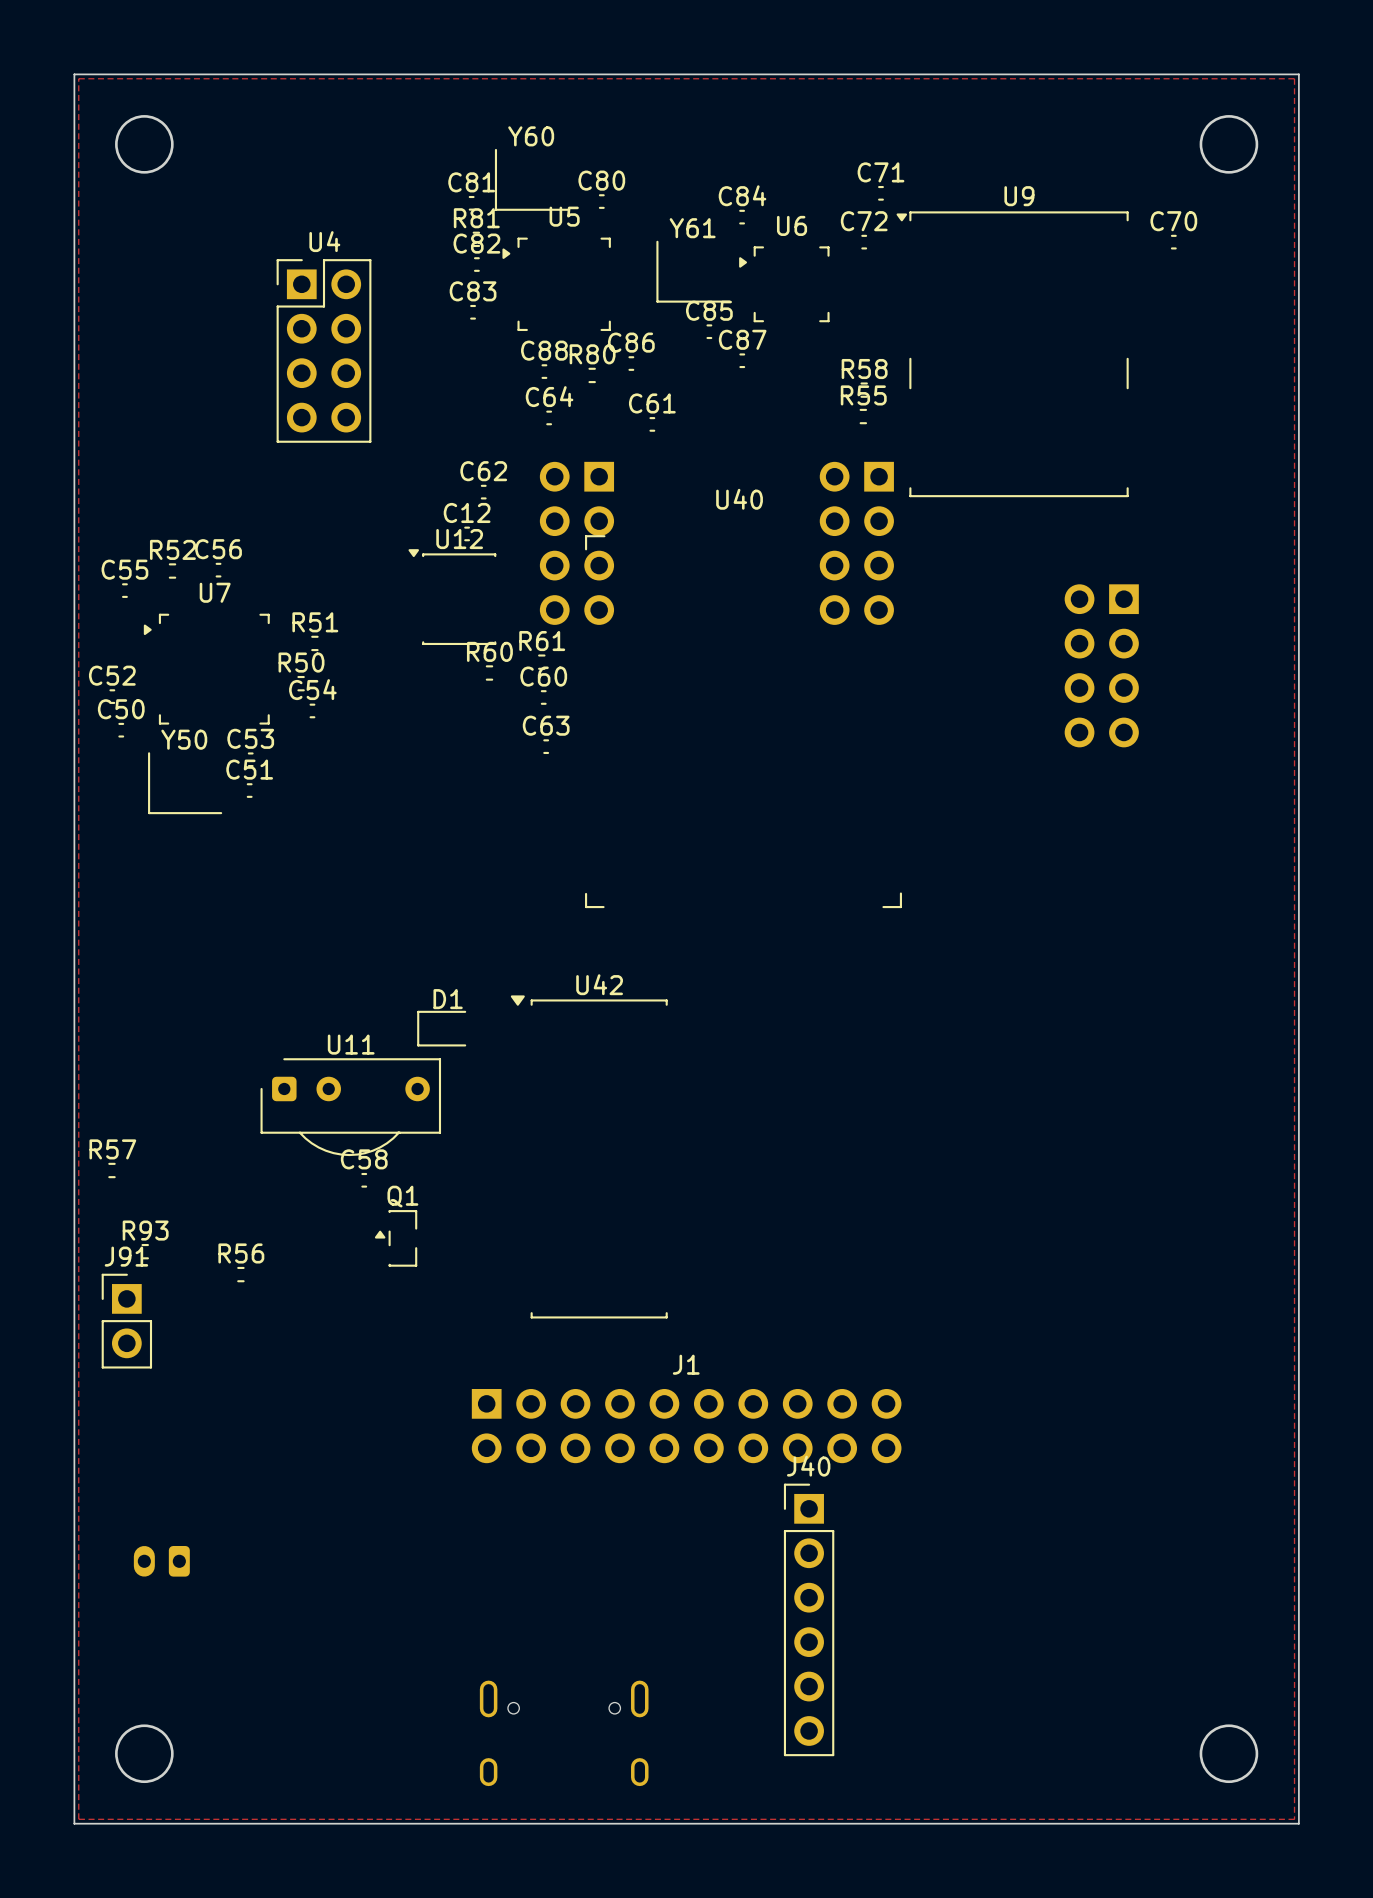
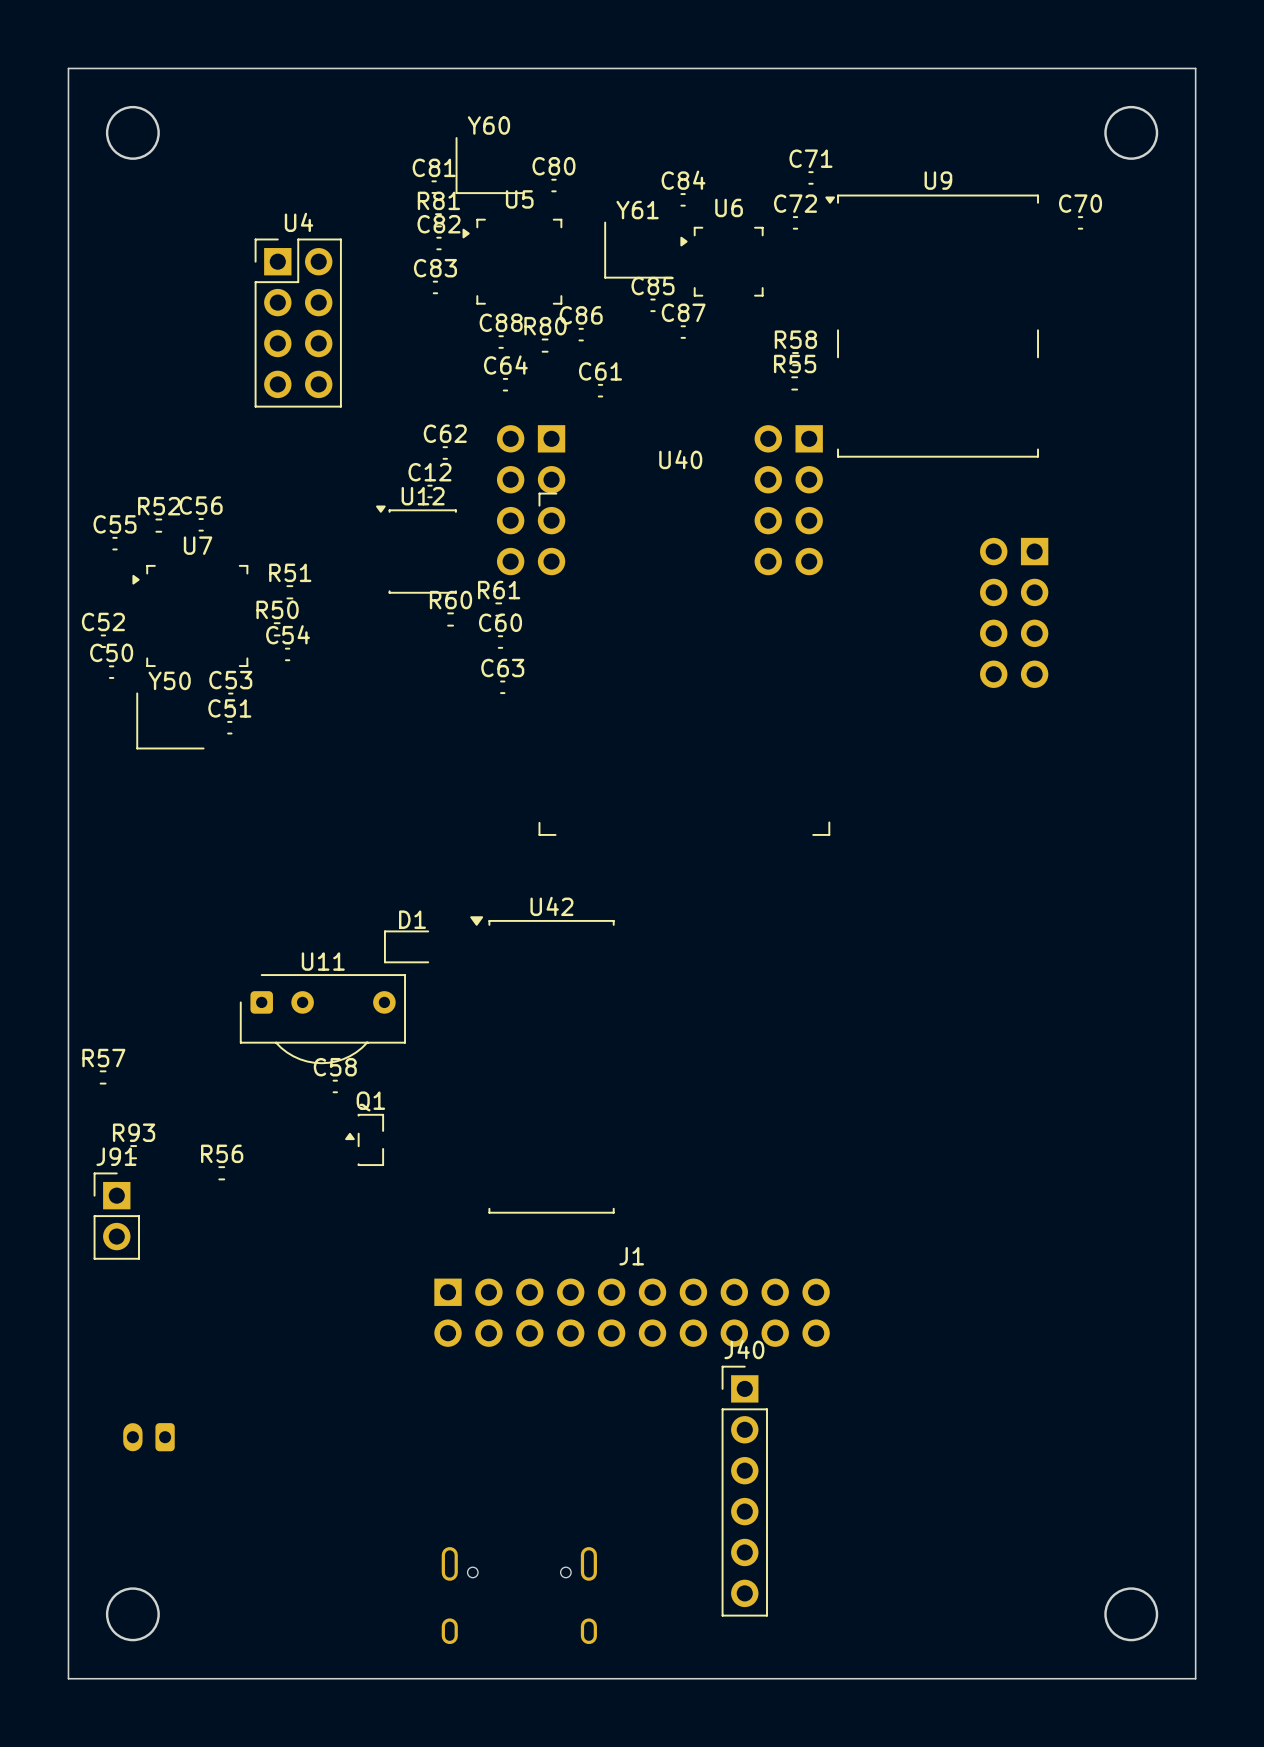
zone outline: (78, 78) (1294, 78) (1294, 1819) (78, 1819) (78, 78) -> none

